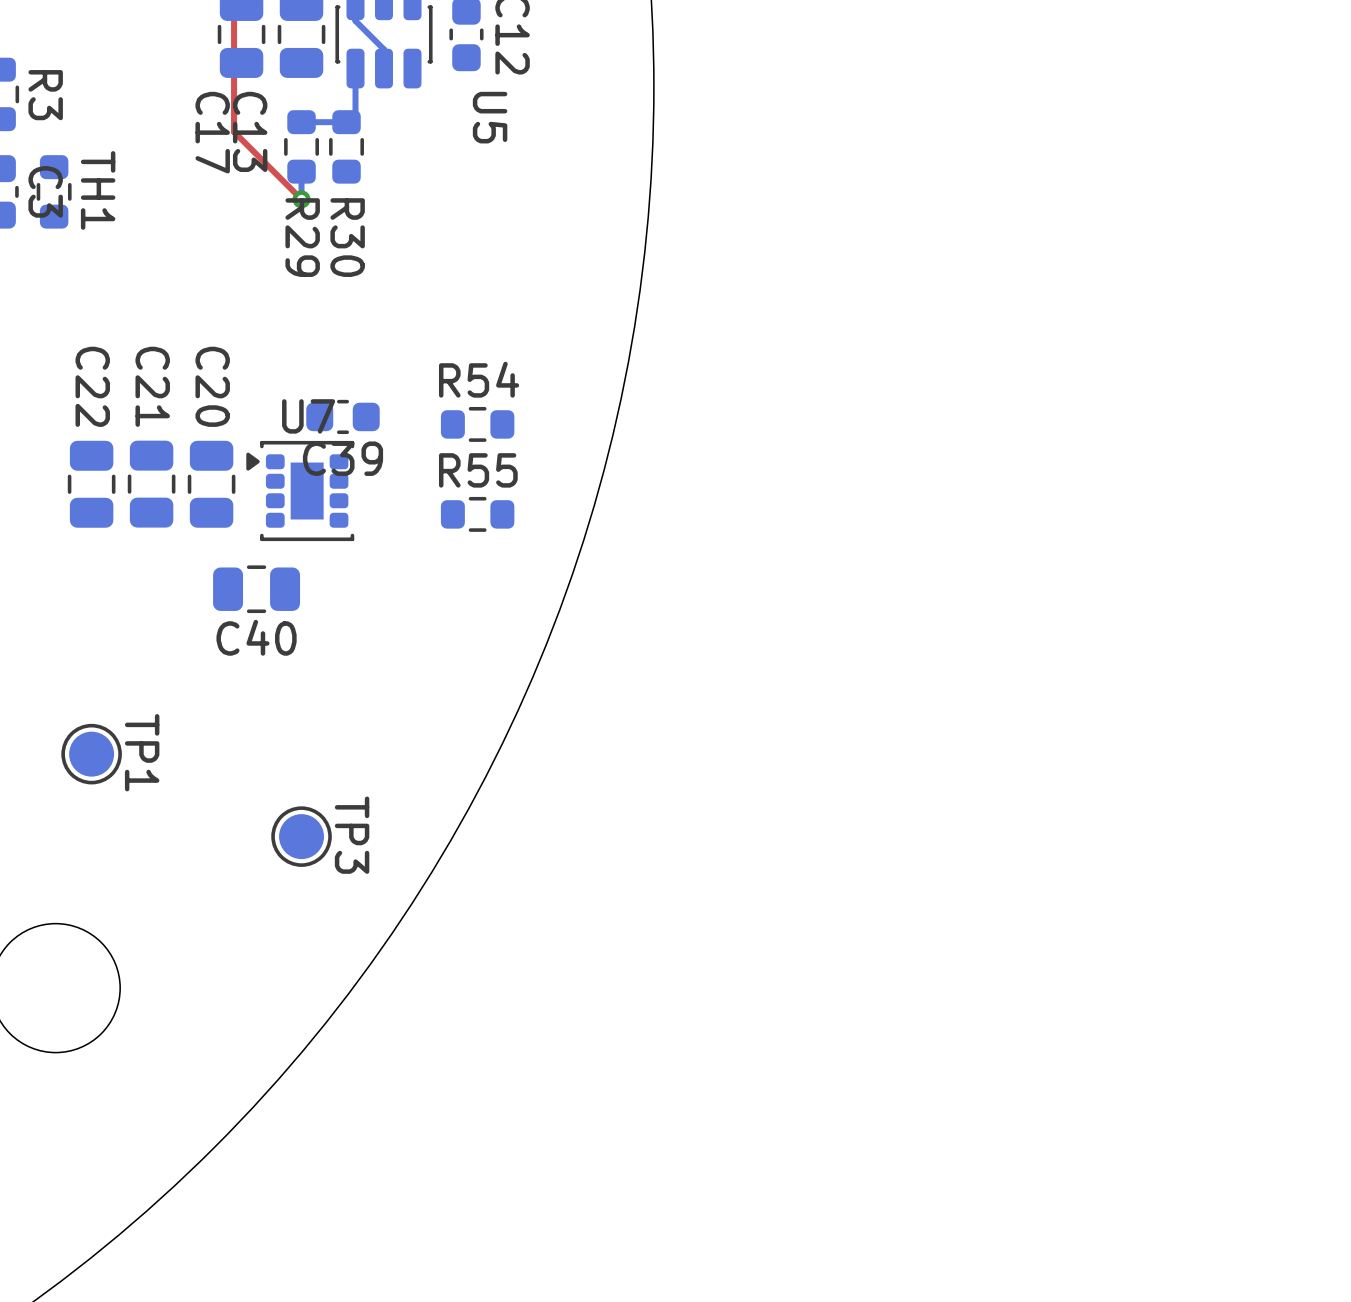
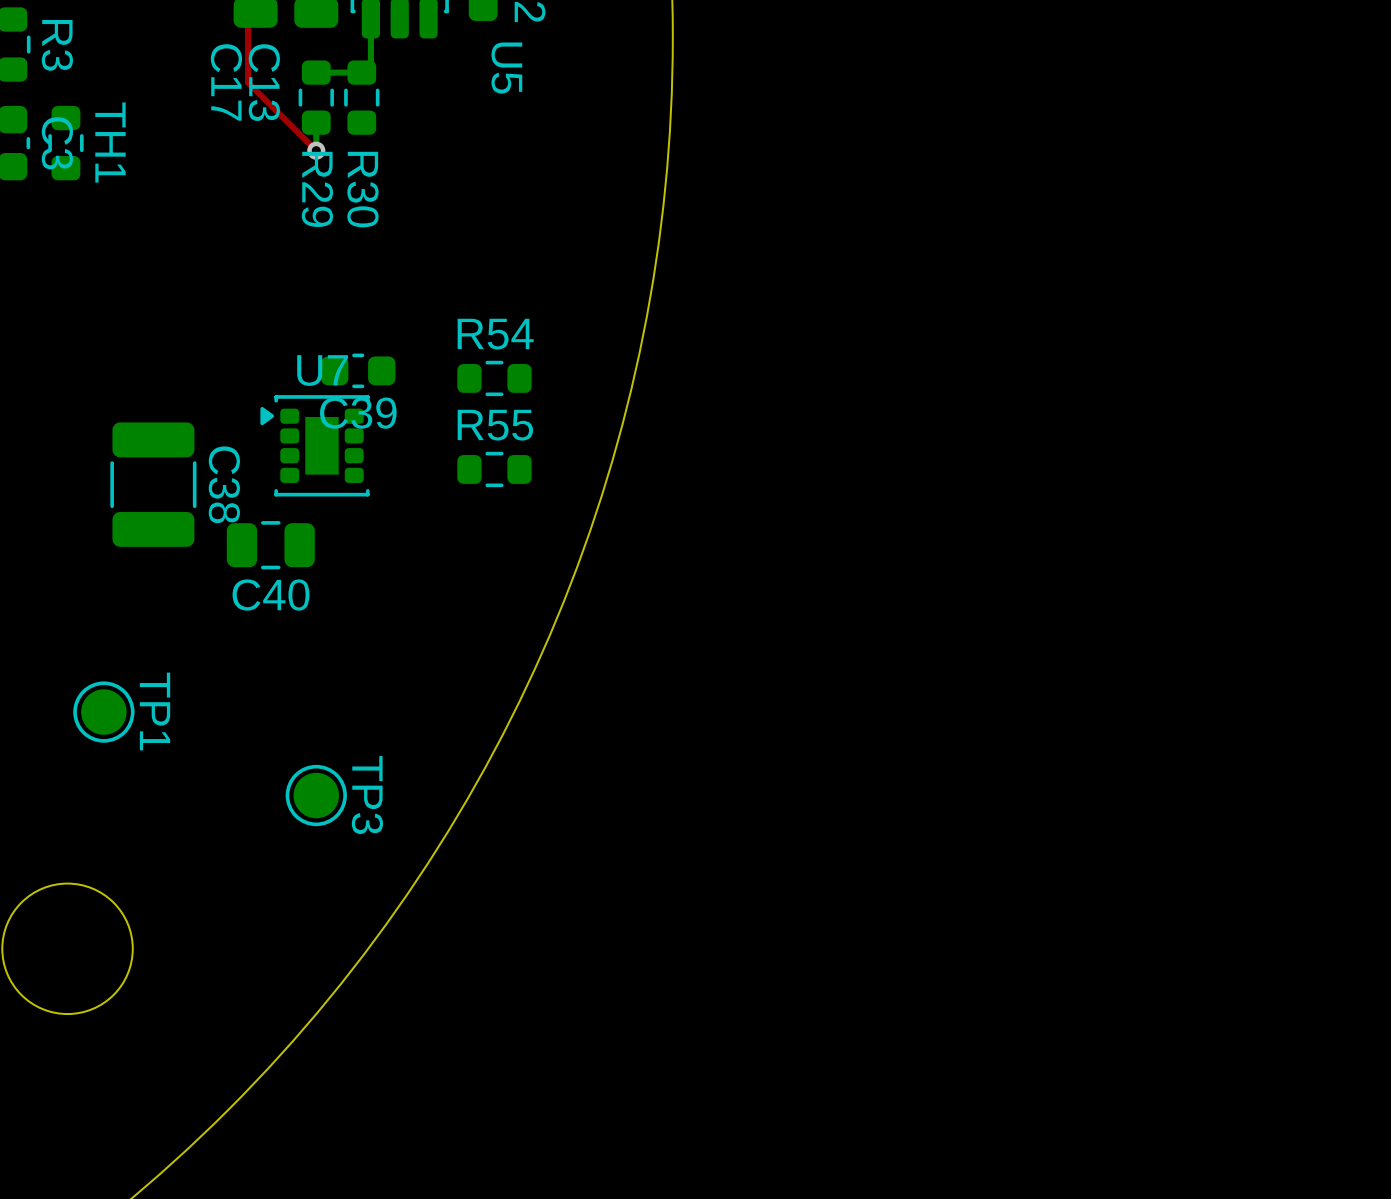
C22: (91, 484) -> none
C21: (151, 484) -> none
C20: (211, 484) -> none
C38: none -> (153, 484)

